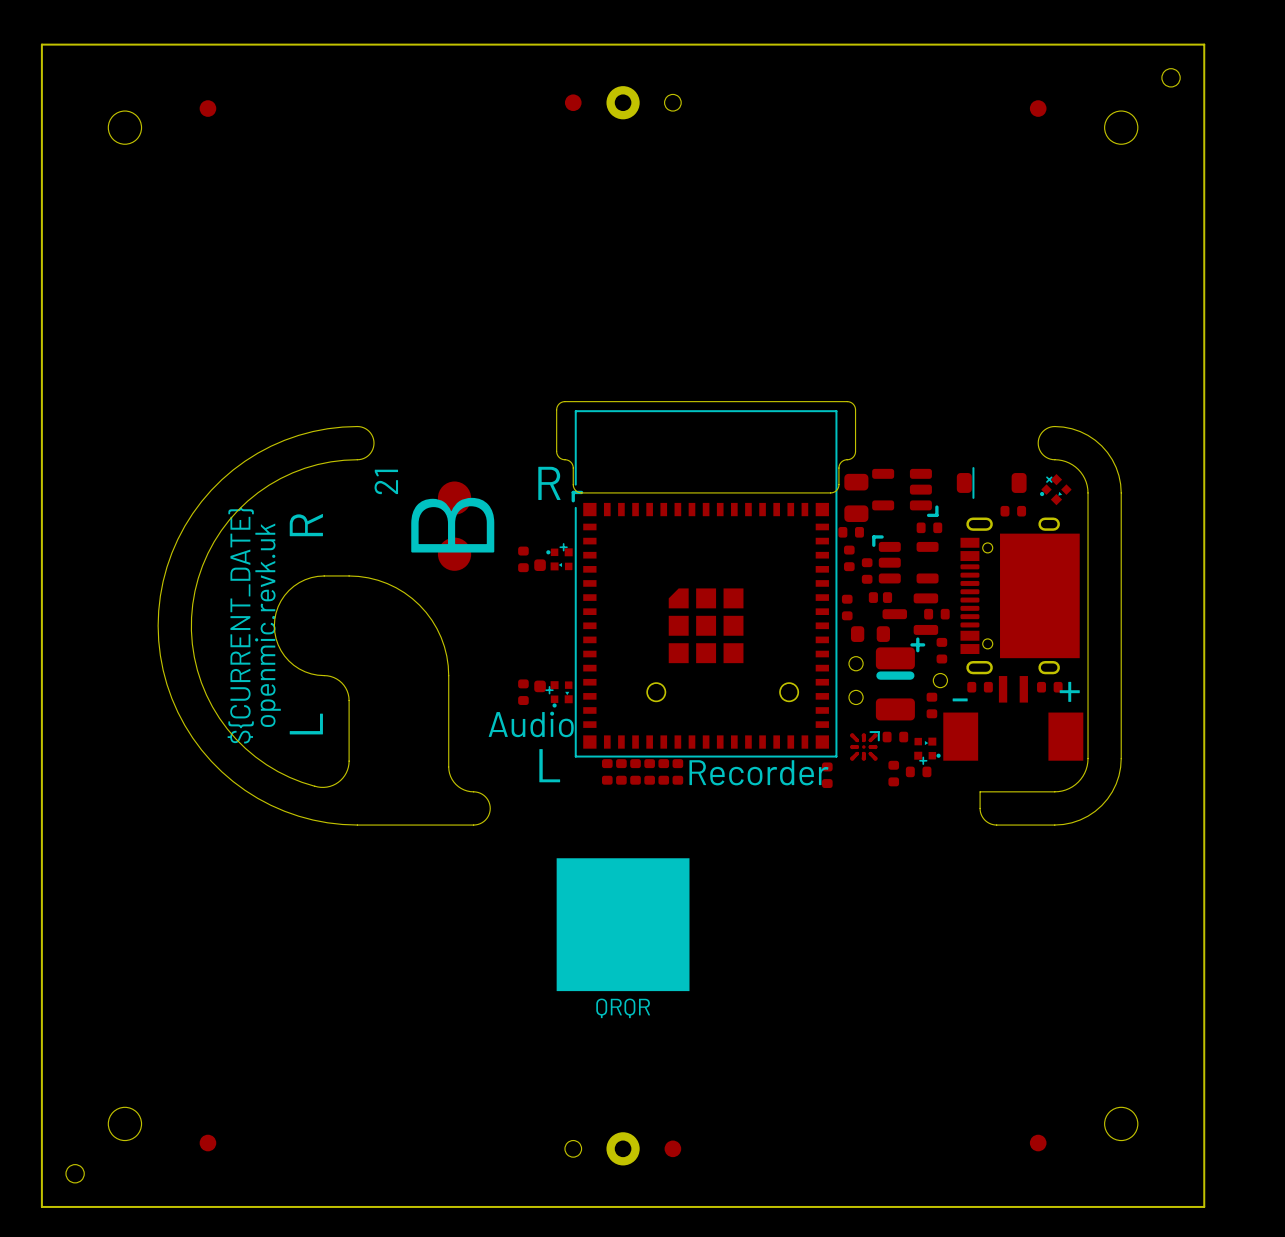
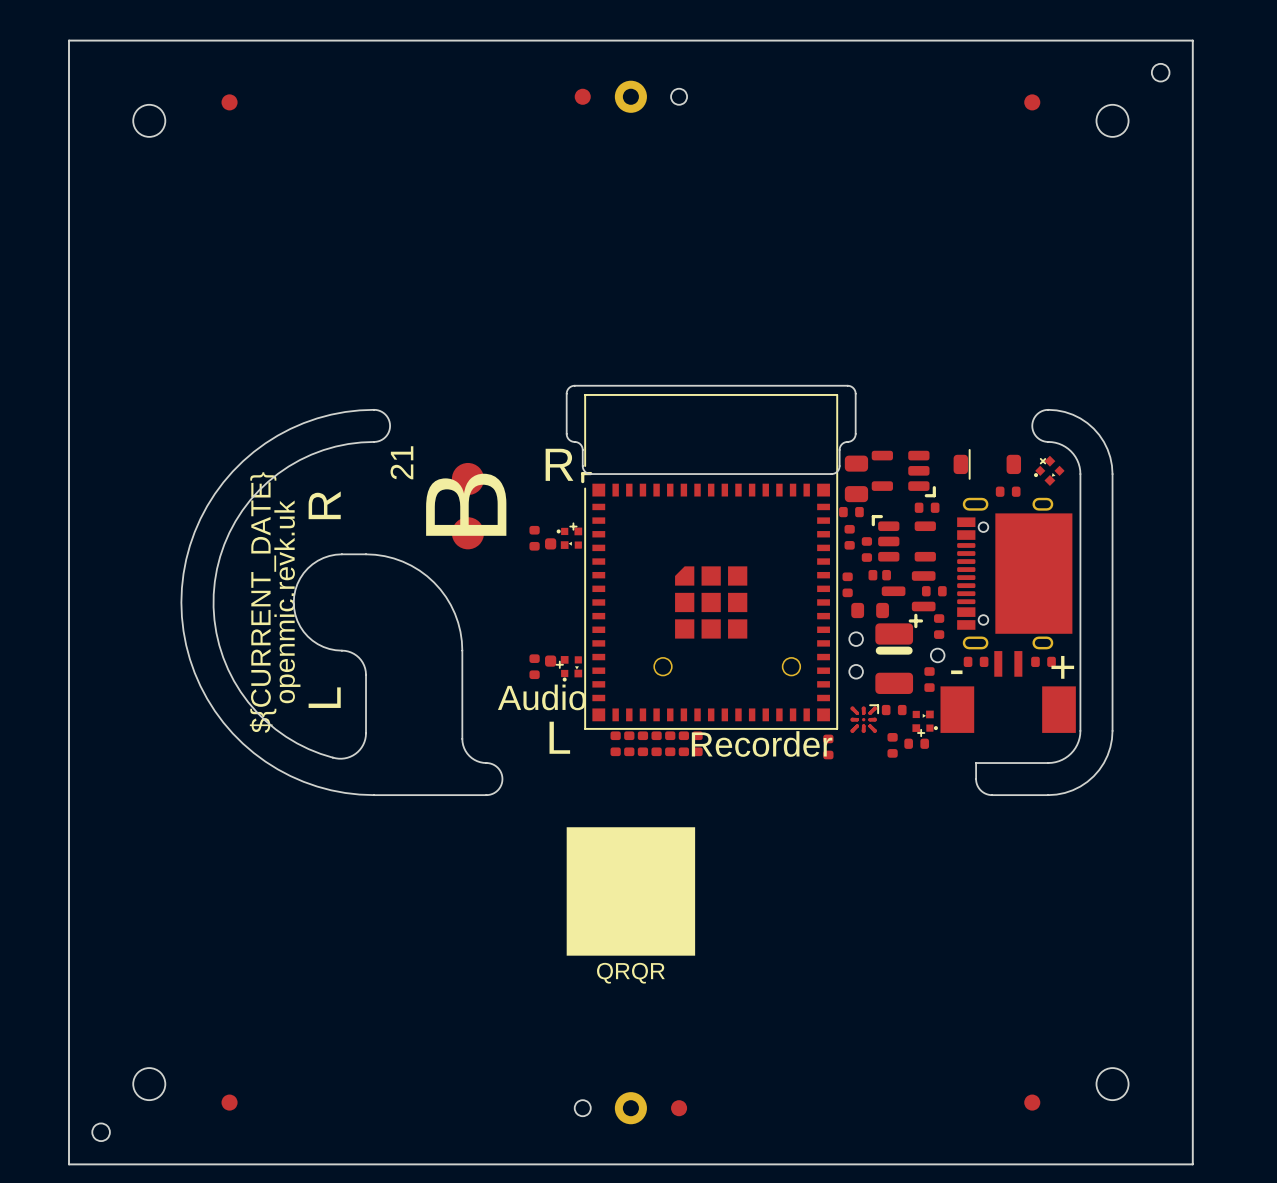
part: none -> (697, 743)

